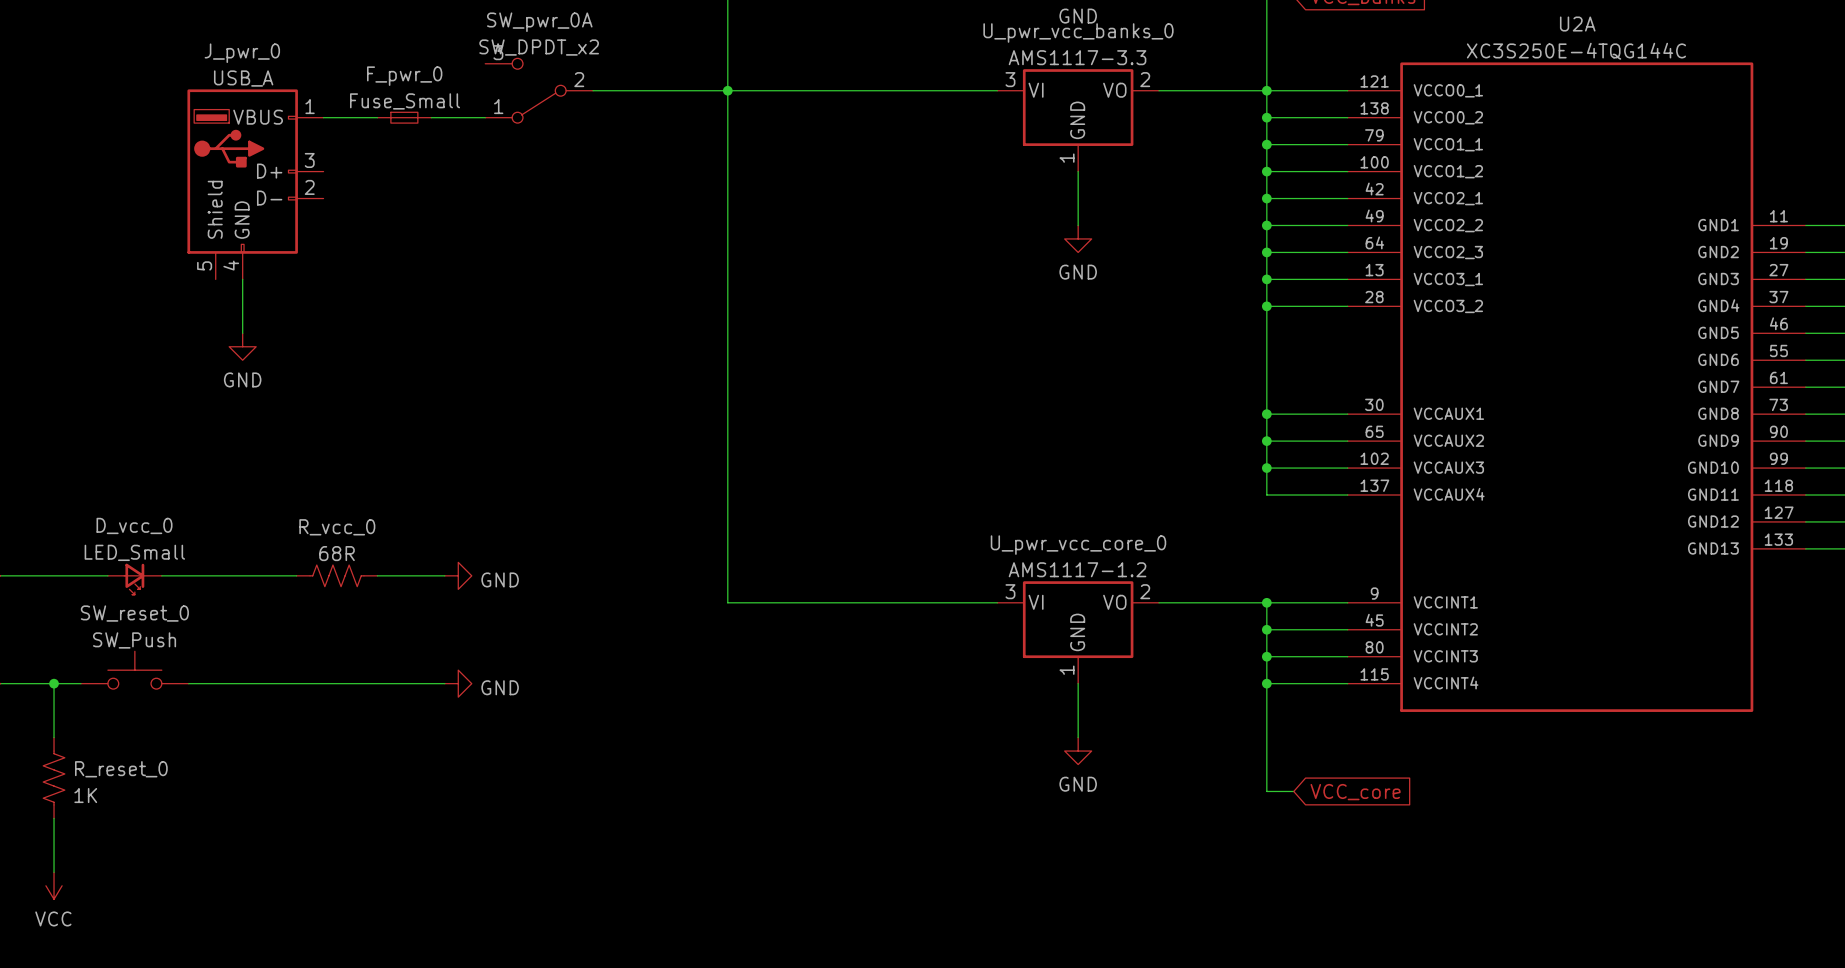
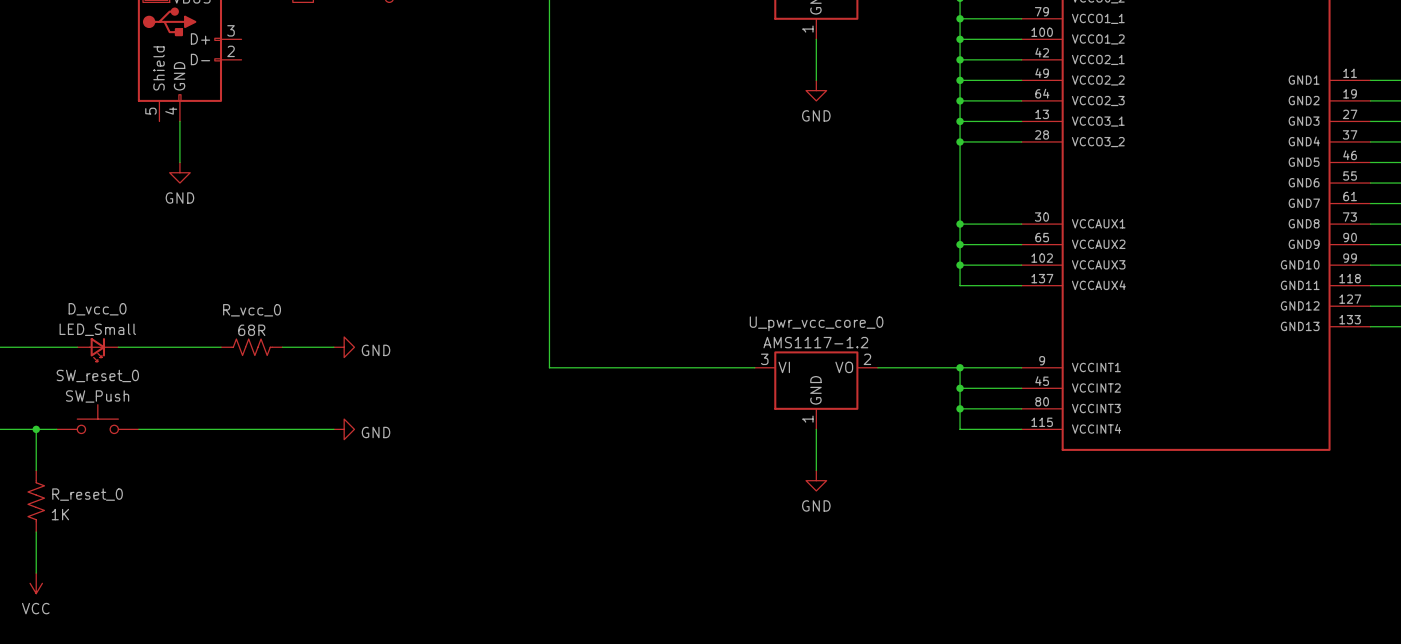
wire: (1266, 683) (1266, 791) (1293, 791) -> none
junction: (1266, 683) -> none
global label: VCC_core (1355, 792) -> none

